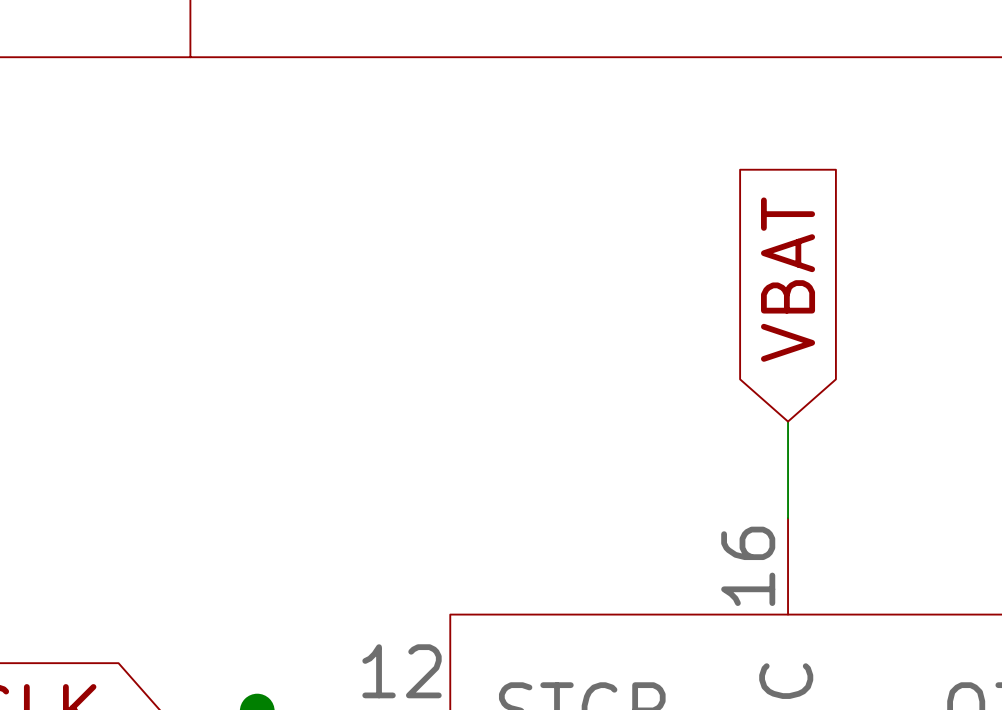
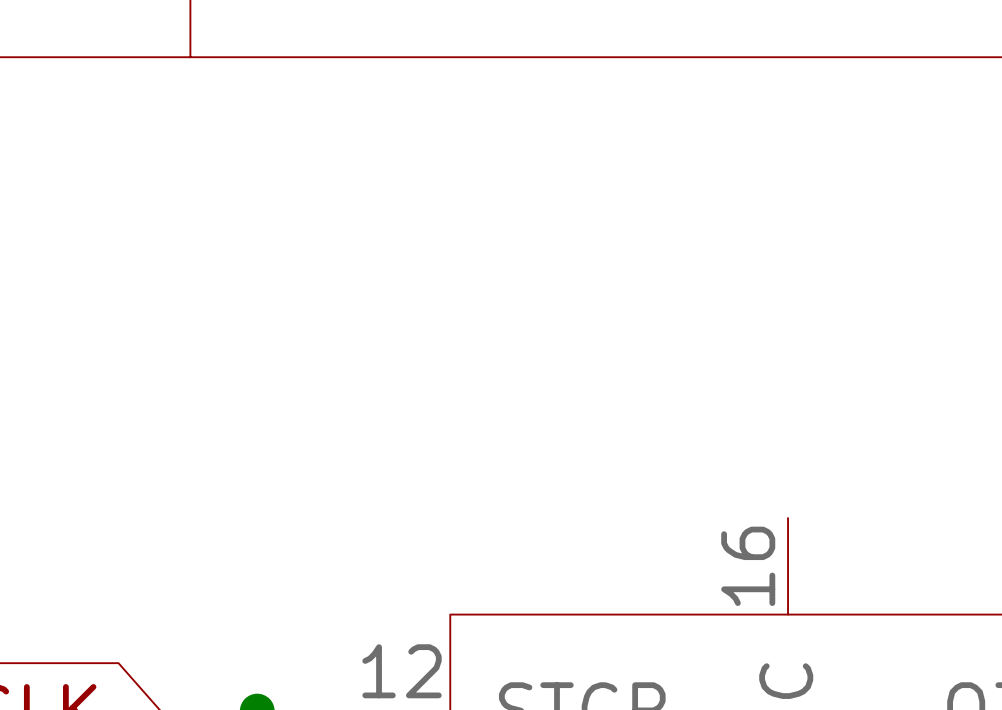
global label: VBAT (788, 279) -> none
wire: (788, 421) (788, 518) -> none

